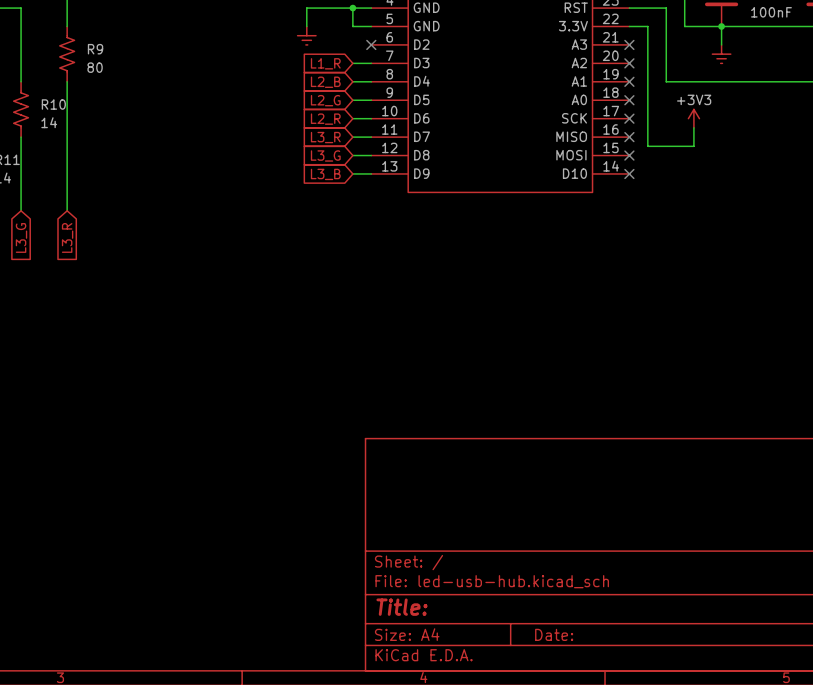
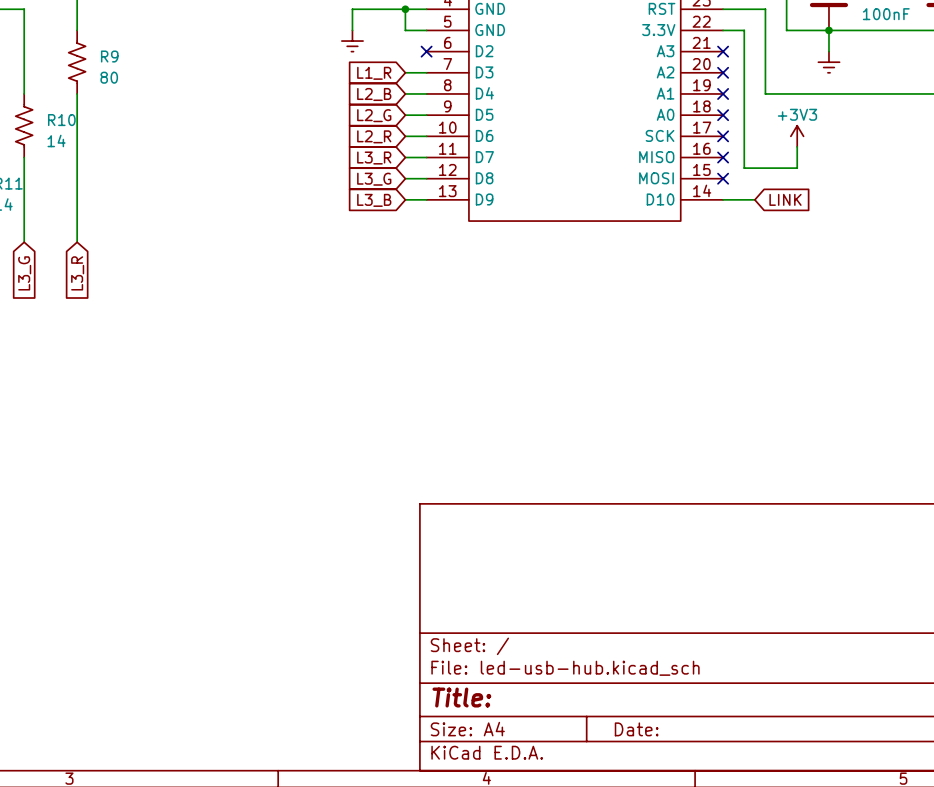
wire: none -> (723, 199) (754, 199)
no-connect mark: (629, 173) -> none
global label: none -> LINK (785, 199)

